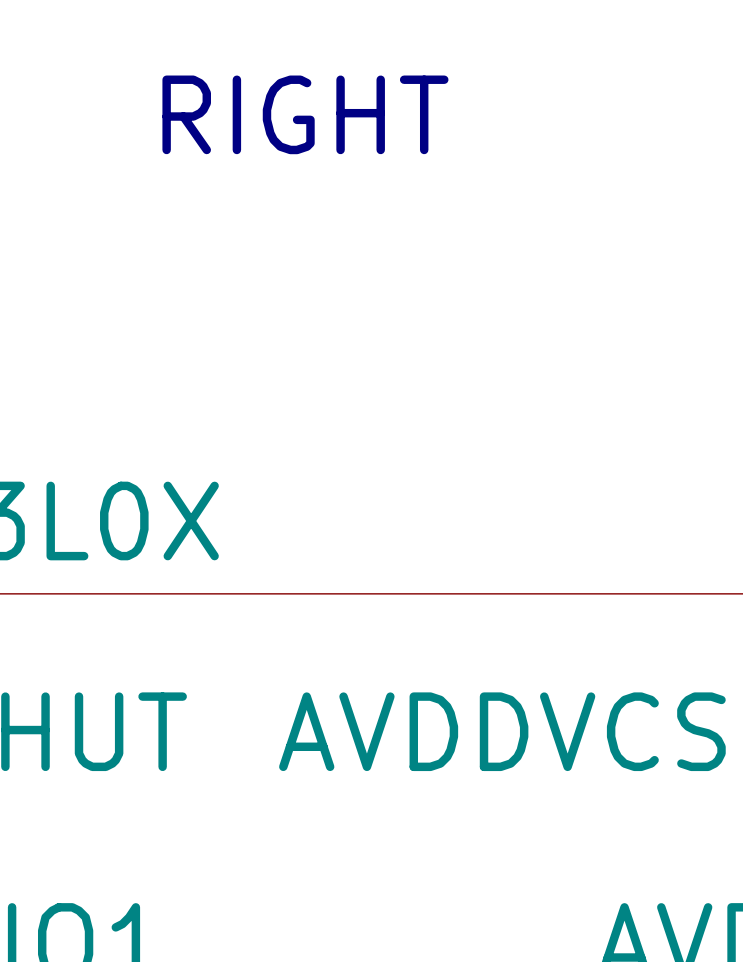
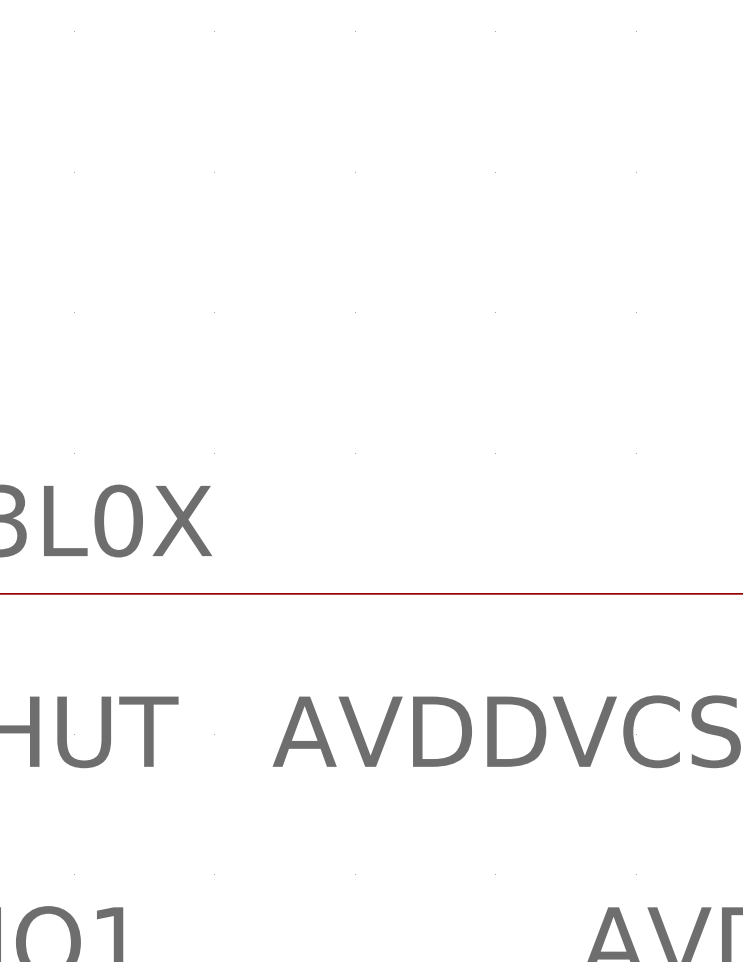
text: RIGHT (305, 114) -> none

